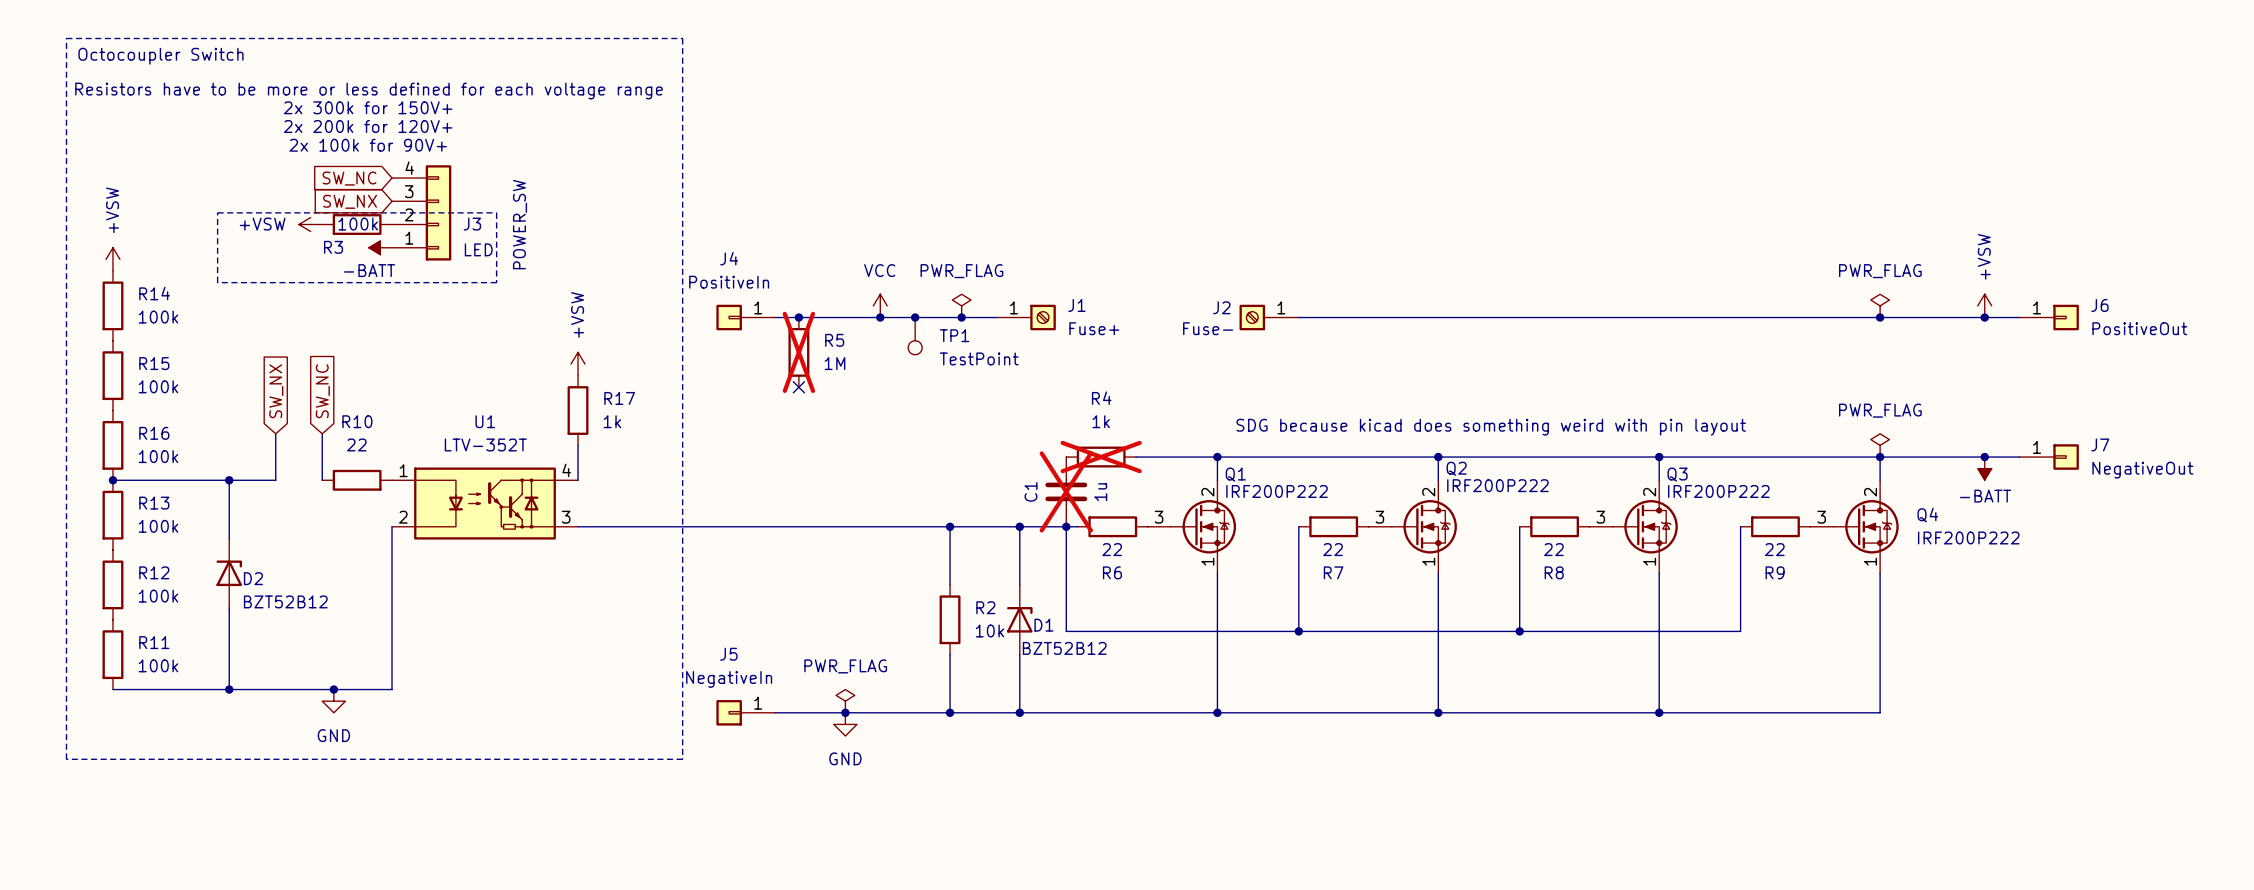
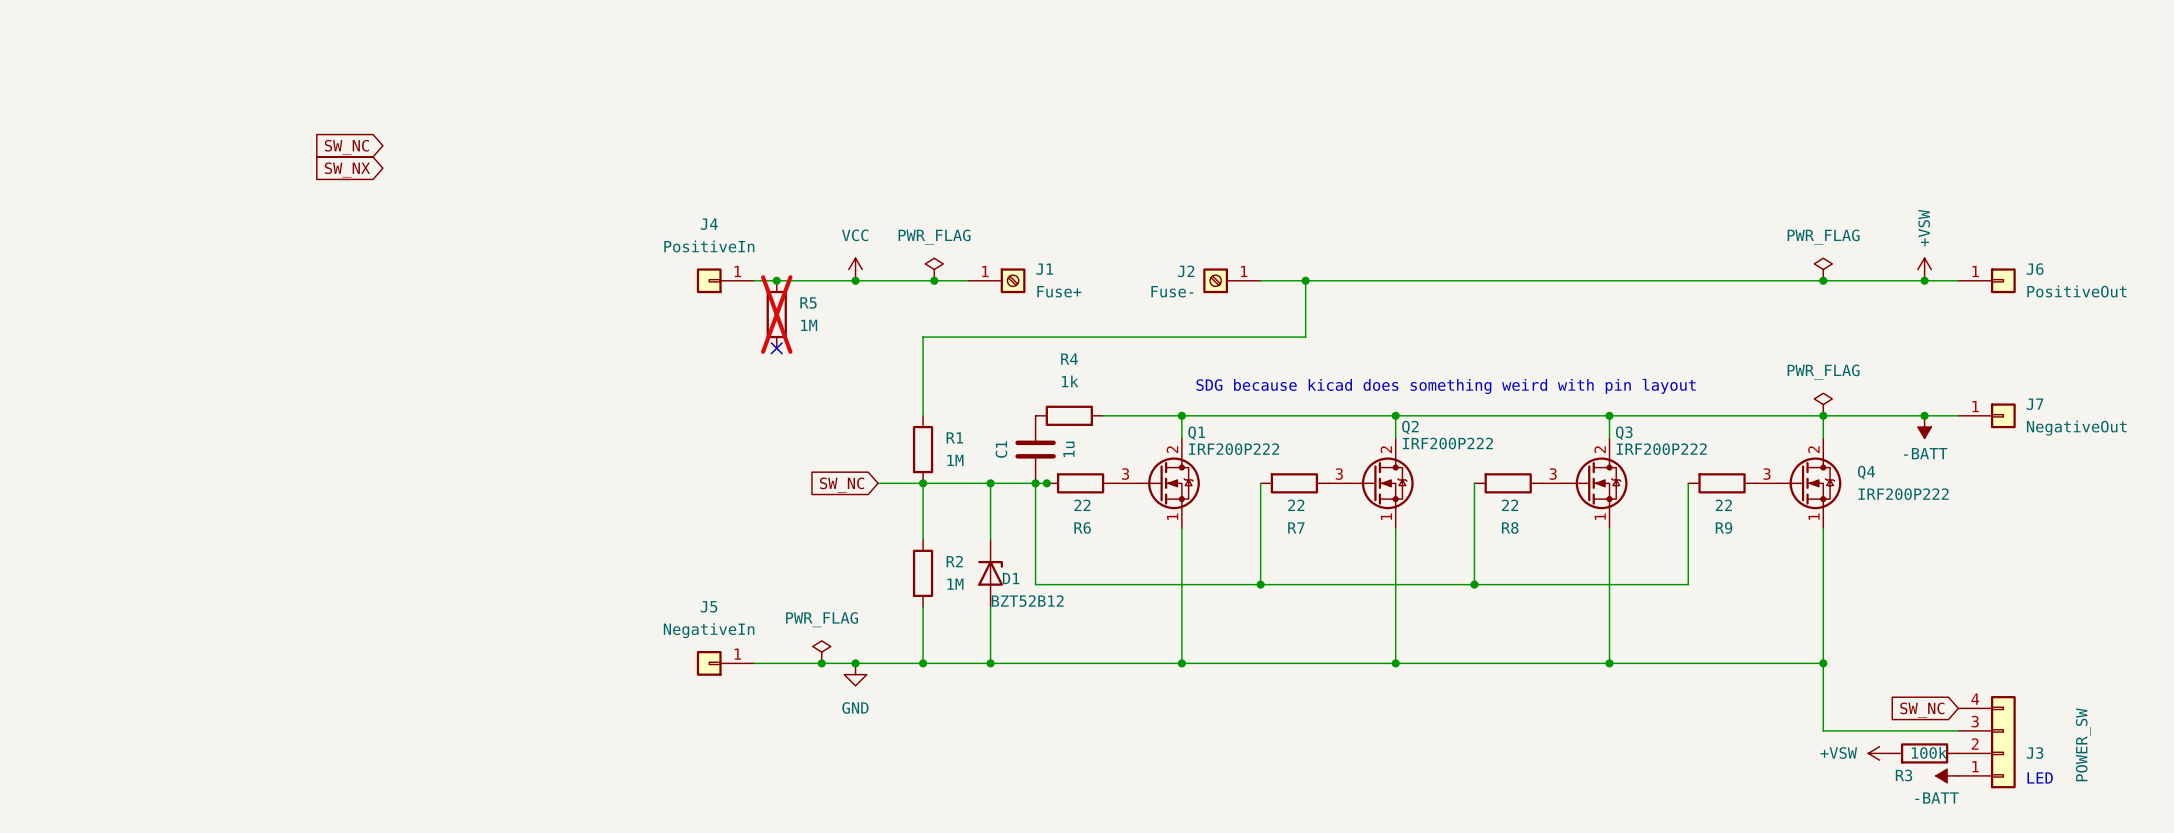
line: (66, 38) (682, 38) (682, 759) (66, 759) (66, 38) -> none
text: Octocoupler Switch (160, 56) -> none
text: Resistors have to be more or less defined for each voltage range (369, 91) -> none
text: 2x 300k for 150V+ (368, 107) -> none
text: 2x 200k for 120V+ (368, 126) -> none
text: 2x 100k for 90V+ (368, 145) -> none
line: (217, 212) (496, 212) (496, 282) (217, 282) (217, 212) -> none
J3 position: (421, 212) -> (1987, 742)
power symbol: +VSW (310, 224) -> none
R3 position: (357, 224) -> (1924, 753)
power symbol: -BATT (380, 247) -> none
text: LED (478, 249) -> none
power symbol: +VSW (112, 259) -> none
R14: 100k (112, 305) -> none
junction: (915, 317) -> none
wire: none -> (1305, 280) (1305, 337) (923, 337) (923, 415)
junction: none -> (1305, 280)
TP1: TestPoint (915, 336) -> none
power symbol: +VSW (578, 364) -> none
R15: 100k (112, 375) -> none
global label: SW_NX (276, 391) -> none
global label: SW_NC (322, 391) -> none
R17: 1k (578, 410) -> none
wire: (275, 433) (275, 480) (112, 480) -> none
wire: (322, 433) (322, 480) -> none
R16: 100k (112, 445) -> none
wire: (578, 445) (578, 480) -> none
R4 do-not-place cross: (1101, 457) -> none
junction: (112, 480) -> none
wire: (229, 480) (229, 538) -> none
junction: (229, 480) -> none
R10: 22 (357, 480) -> none
R1: none -> 1M (923, 449)
C1 do-not-place cross: (1066, 491) -> none
U1: LTV-352T (485, 503) -> none
R13: 100k (112, 515) -> none
wire: (392, 526) (392, 689) (112, 689) -> none
wire: (578, 526) (903, 526) -> none
junction: none -> (1046, 483)
global label: none -> SW_NC (842, 485)
D2: BZT52B12 (229, 573) -> none
R12: 100k (112, 584) -> none
wire: (229, 608) (229, 689) -> none
R2 value: 10k (989, 630) -> 1M (955, 584)
R11: 100k (112, 654) -> none
junction: (229, 689) -> none
junction: (333, 689) -> none
power symbol: GND (333, 701) -> none
junction: none -> (855, 663)
wire: none -> (1823, 663) (1823, 730) (1958, 730)
junction: none -> (1823, 663)
power symbol position: GND (845, 724) -> GND (855, 674)
global label: none -> SW_NC (1922, 710)
power symbol: none -> +VSW (1879, 753)
power symbol: none -> -BATT (1947, 775)
text: none -> LED (2040, 777)

